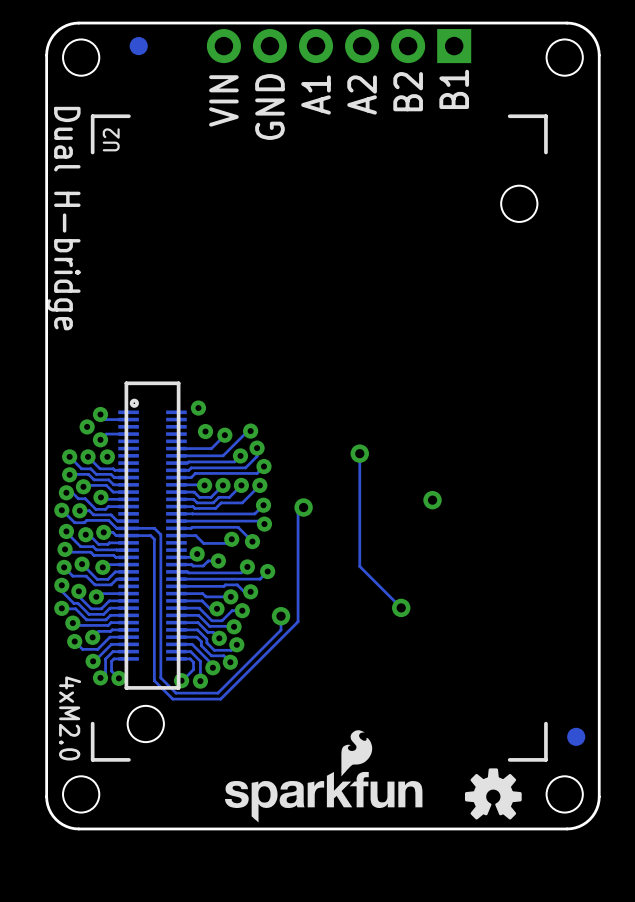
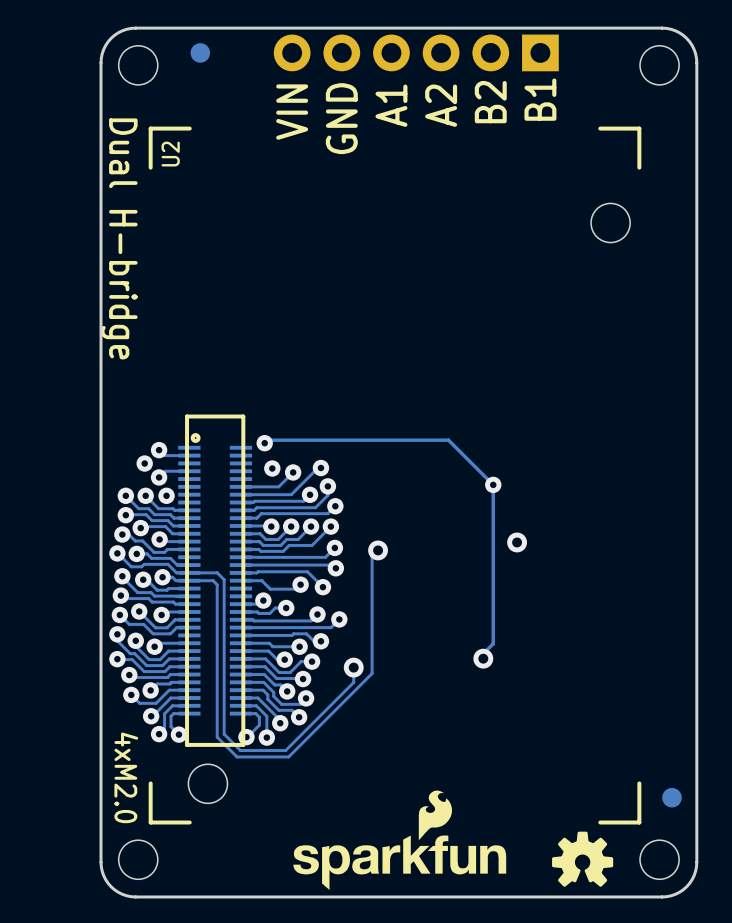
track: none -> (264, 443) (267, 440) (448, 440) (493, 484) (493, 643) (478, 658)
via: none -> (493, 484)
track: (359, 453) (359, 566) (401, 607) -> none
via: (359, 453) -> none

